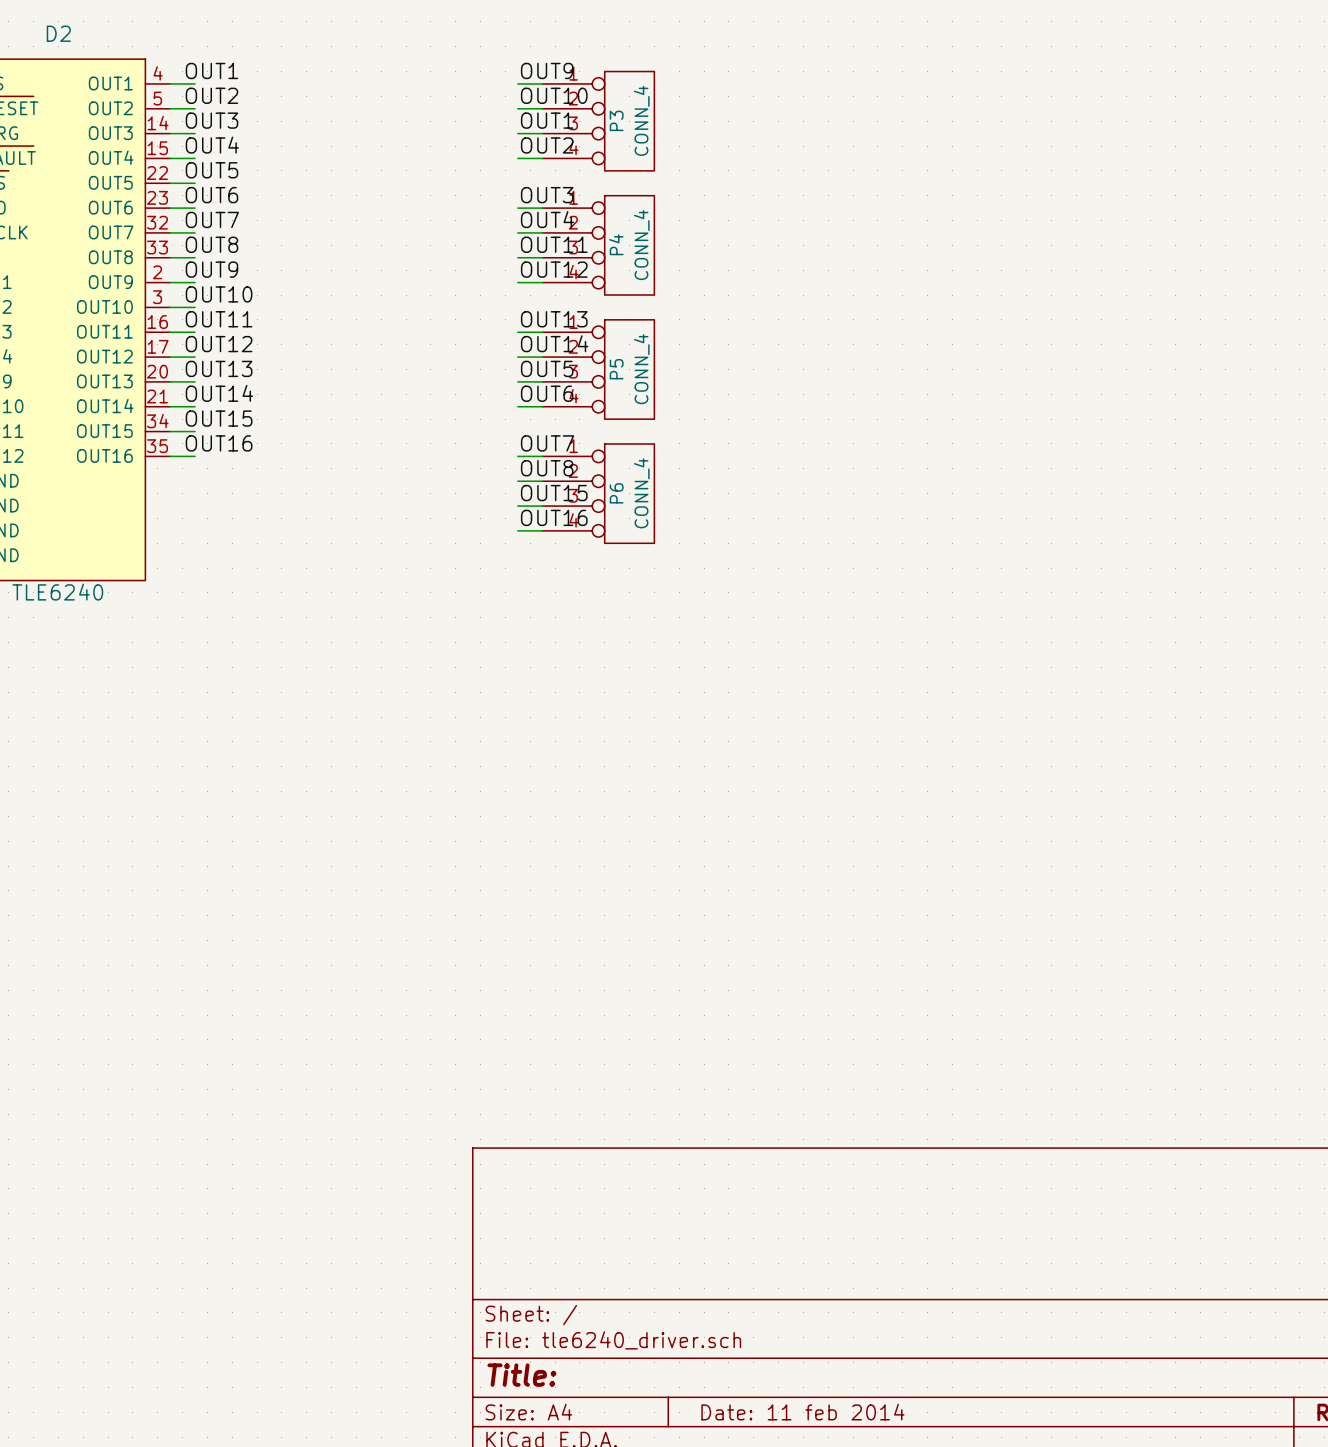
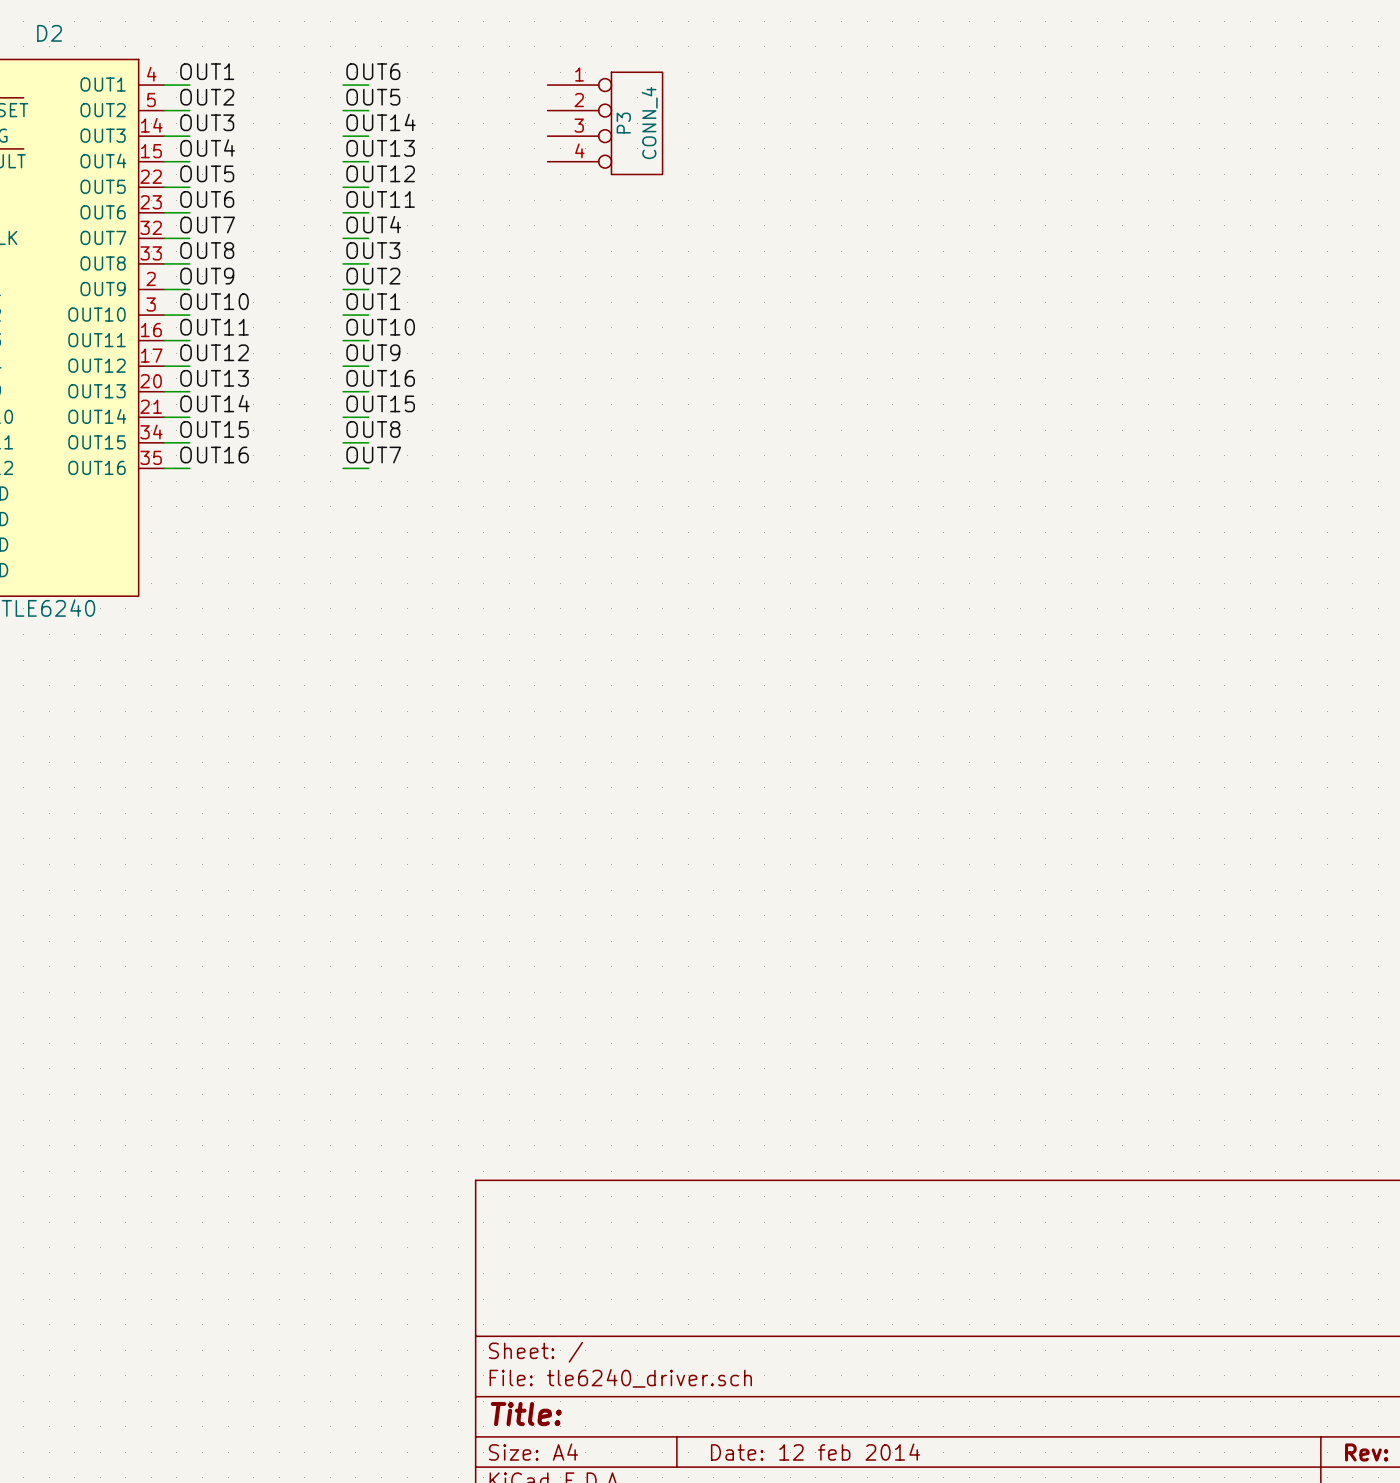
label: none -> OUT6 (373, 71)
label: OUT9 (547, 70) -> none
wire: (517, 83) (542, 83) -> (343, 85) (368, 85)
label: none -> OUT5 (373, 97)
label: OUT10 (554, 95) -> none
wire: (517, 108) (542, 108) -> (343, 110) (368, 110)
label: none -> OUT14 (381, 122)
label: OUT1 (547, 120) -> none
wire: (517, 133) (542, 133) -> (343, 136) (368, 136)
label: none -> OUT13 (380, 148)
label position: OUT2 (547, 145) -> OUT2 (373, 276)
wire: (517, 158) (542, 158) -> (343, 161) (368, 161)
wire: none -> (343, 187) (368, 187)
label position: OUT3 (547, 195) -> OUT3 (373, 250)
wire: (517, 208) (542, 208) -> (343, 212) (368, 212)
label position: OUT4 (547, 219) -> OUT4 (373, 224)
wire: (517, 232) (542, 232) -> (343, 238) (368, 238)
label position: OUT11 (554, 244) -> OUT11 (380, 199)
P4: CONN_4 (598, 245) -> none
wire: (517, 257) (542, 257) -> (343, 263) (368, 263)
label position: OUT12 (554, 269) -> OUT12 (380, 173)
wire: (517, 282) (542, 282) -> (343, 289) (368, 289)
label: none -> OUT1 (373, 301)
wire: none -> (343, 315) (368, 315)
label: none -> OUT10 (380, 327)
label: OUT13 (554, 319) -> none
wire: (517, 332) (542, 332) -> (343, 340) (368, 340)
label: OUT14 (554, 343) -> none
label: none -> OUT9 (373, 352)
wire: (517, 357) (542, 357) -> (343, 366) (368, 366)
label: OUT5 (547, 368) -> none
P5: CONN_4 (598, 369) -> none
wire: (517, 381) (542, 381) -> (343, 391) (368, 391)
label: OUT6 (547, 393) -> none
wire: (517, 406) (542, 406) -> (343, 417) (368, 417)
label position: OUT7 (547, 443) -> OUT7 (373, 455)
wire: (517, 456) (542, 456) -> (343, 468) (368, 468)
label position: OUT8 (547, 468) -> OUT8 (373, 429)
wire: (517, 481) (542, 481) -> (343, 442) (368, 442)
label position: OUT15 (554, 493) -> OUT15 (380, 403)
P6: CONN_4 (598, 493) -> none
wire: (517, 506) (542, 506) -> none
label position: OUT16 (554, 517) -> OUT16 (380, 378)
wire: (517, 530) (542, 530) -> none
title block: Date: 11 feb 2014 (802, 1412) -> Date: 12 feb 2014 (815, 1452)

